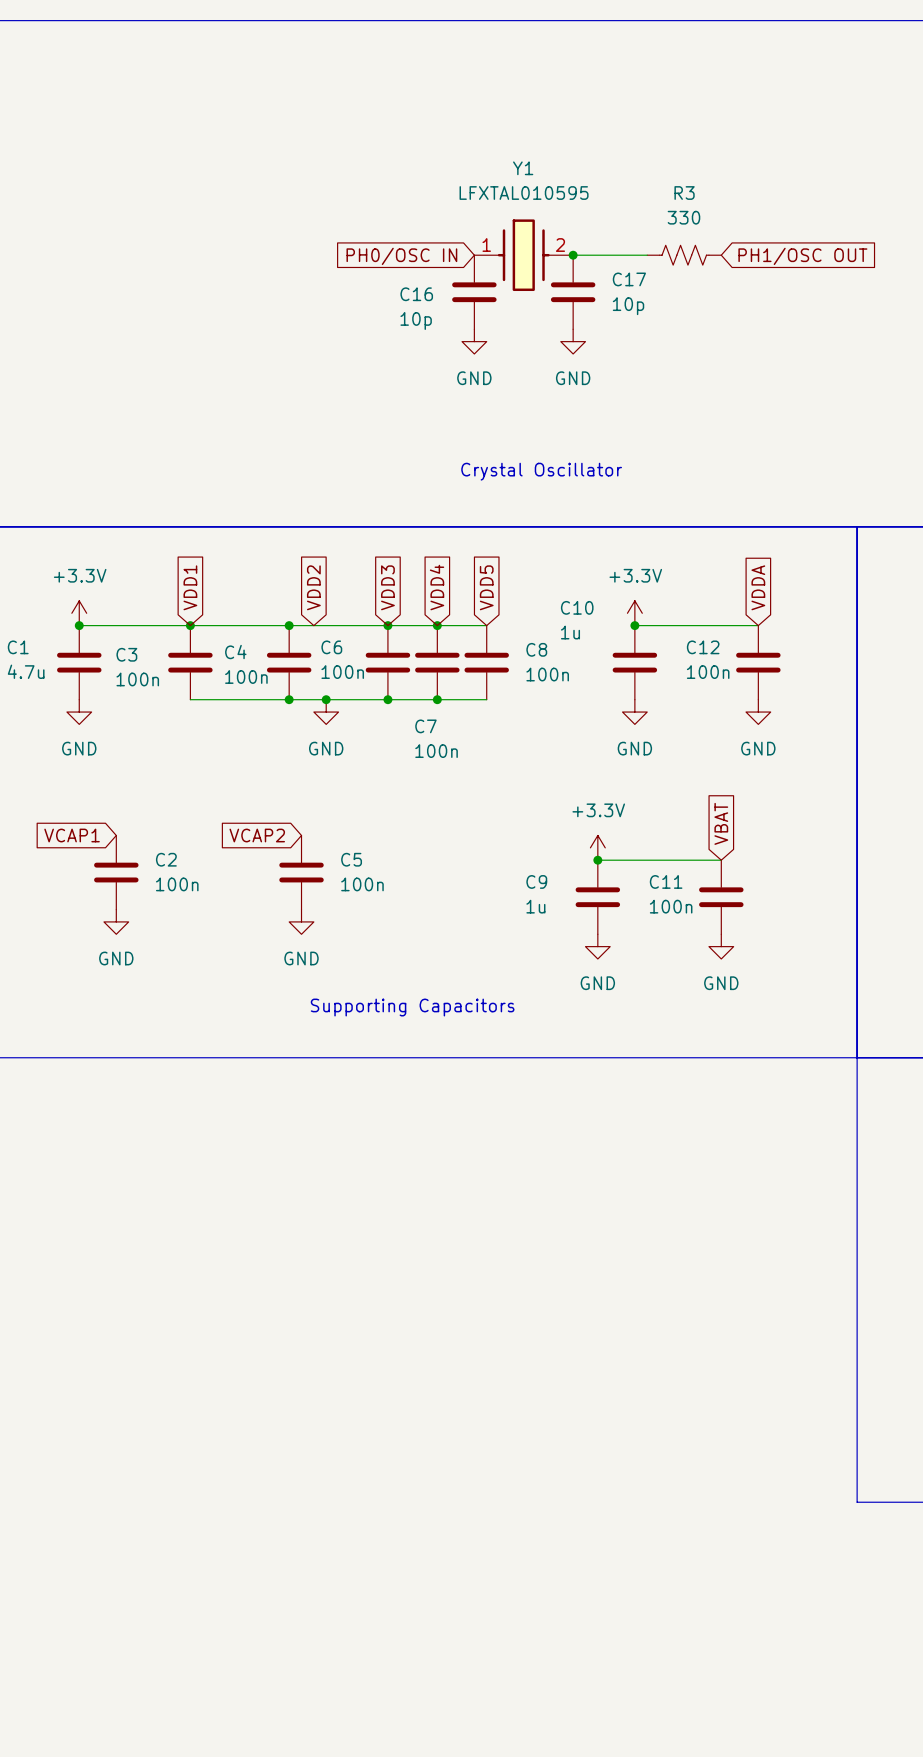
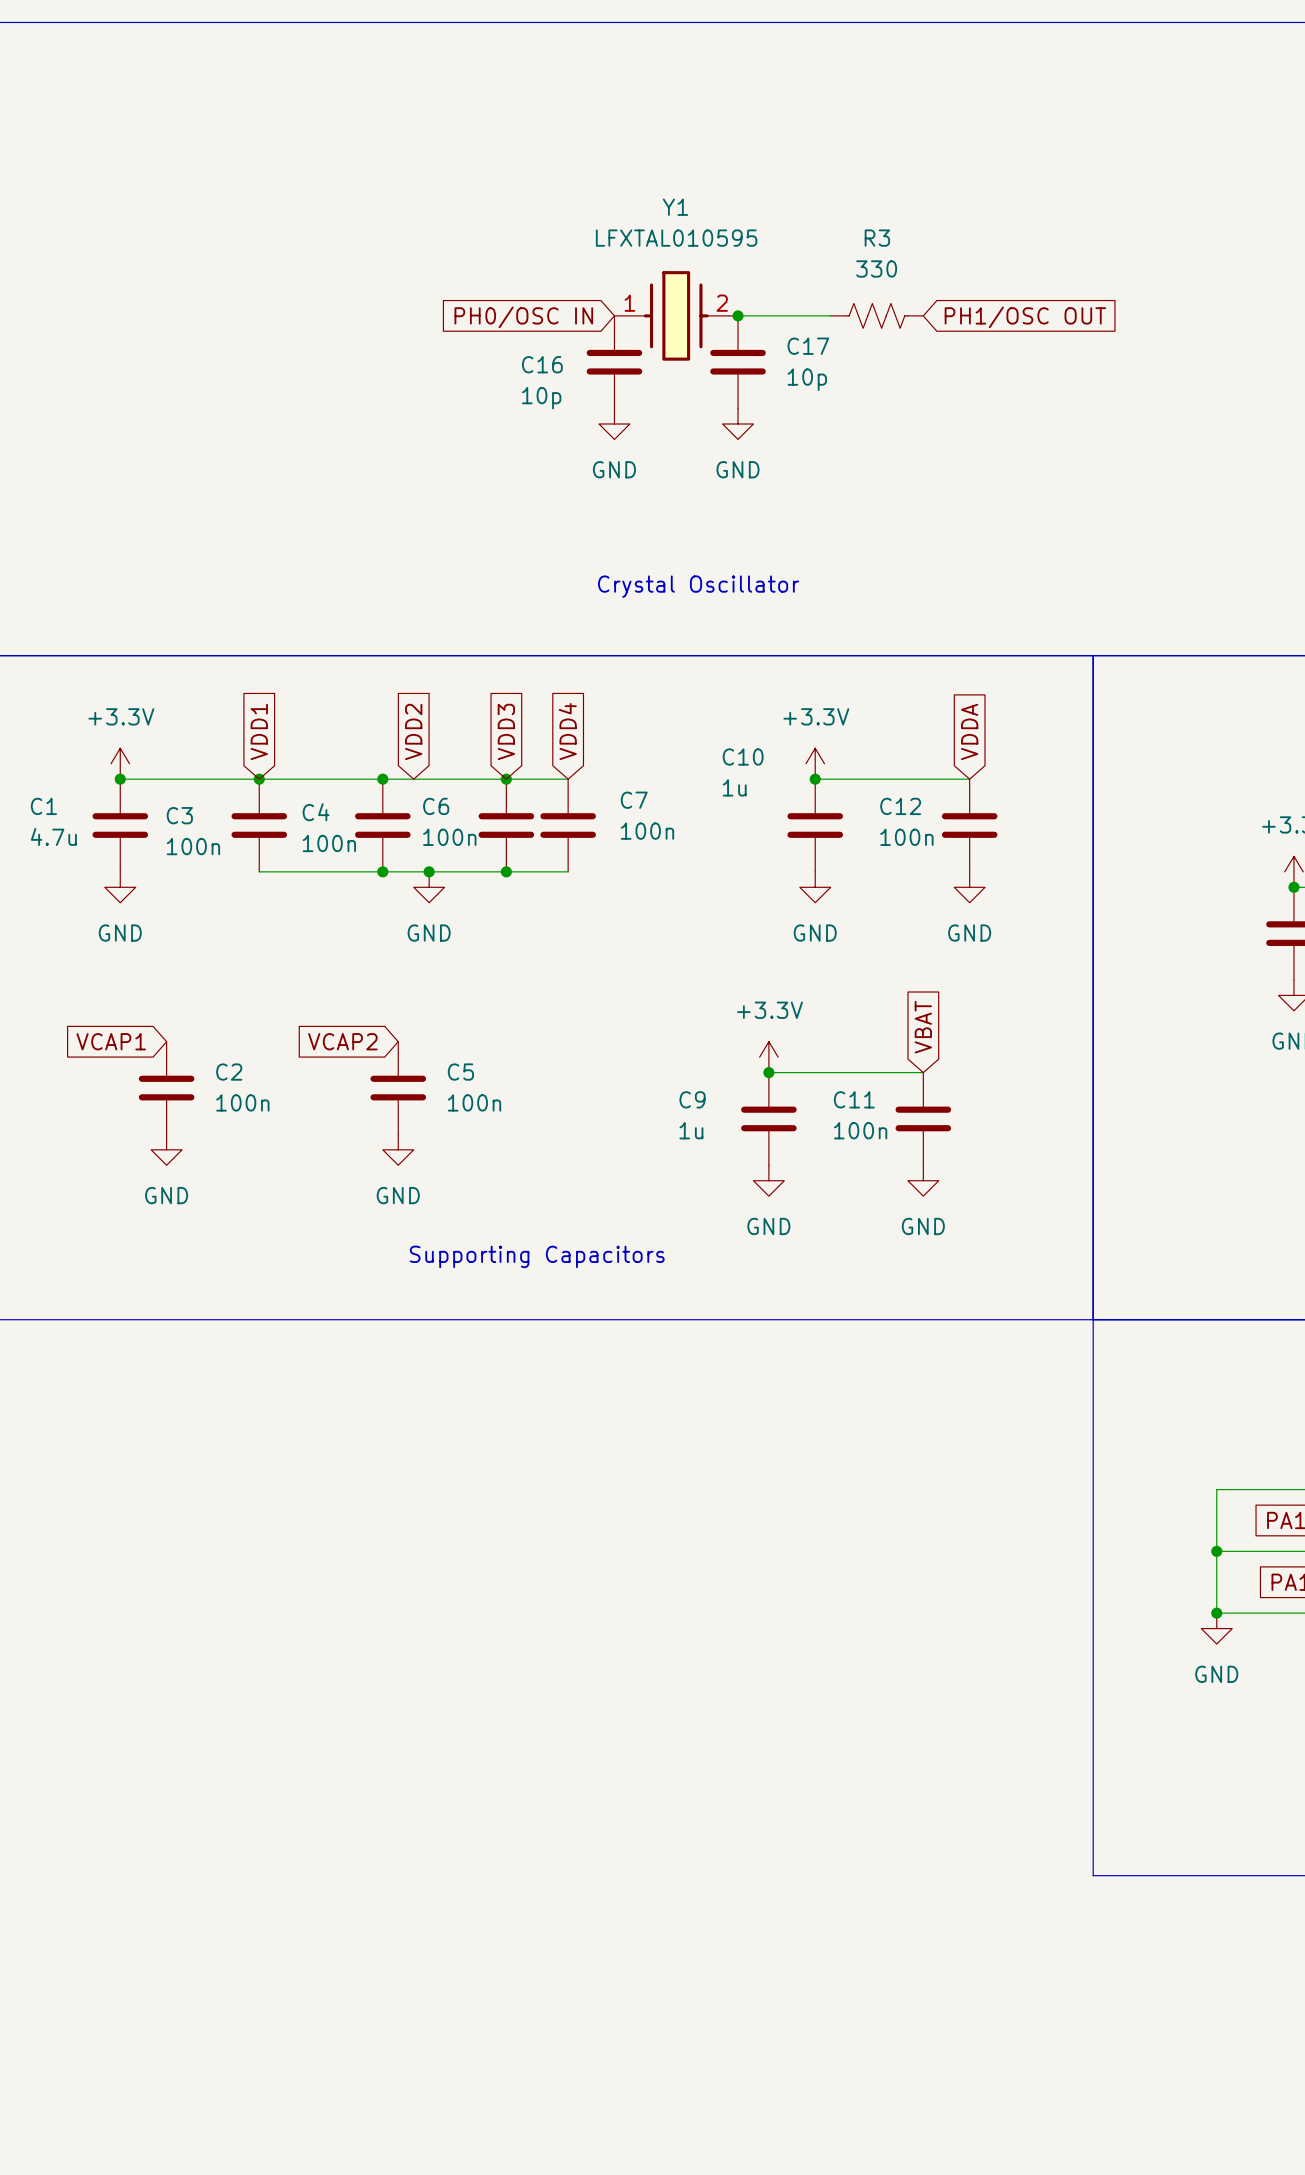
global label: VDD5 (486, 587) -> none
wire: (437, 625) (486, 625) -> none
junction: (437, 625) -> none
C8: 100n (486, 662) -> none
wire: (437, 699) (486, 699) -> none
junction: (437, 699) -> none
C7 name position: C7 (425, 726) -> C7 (634, 800)
C7 value position: 100n (436, 751) -> 100n (647, 831)

